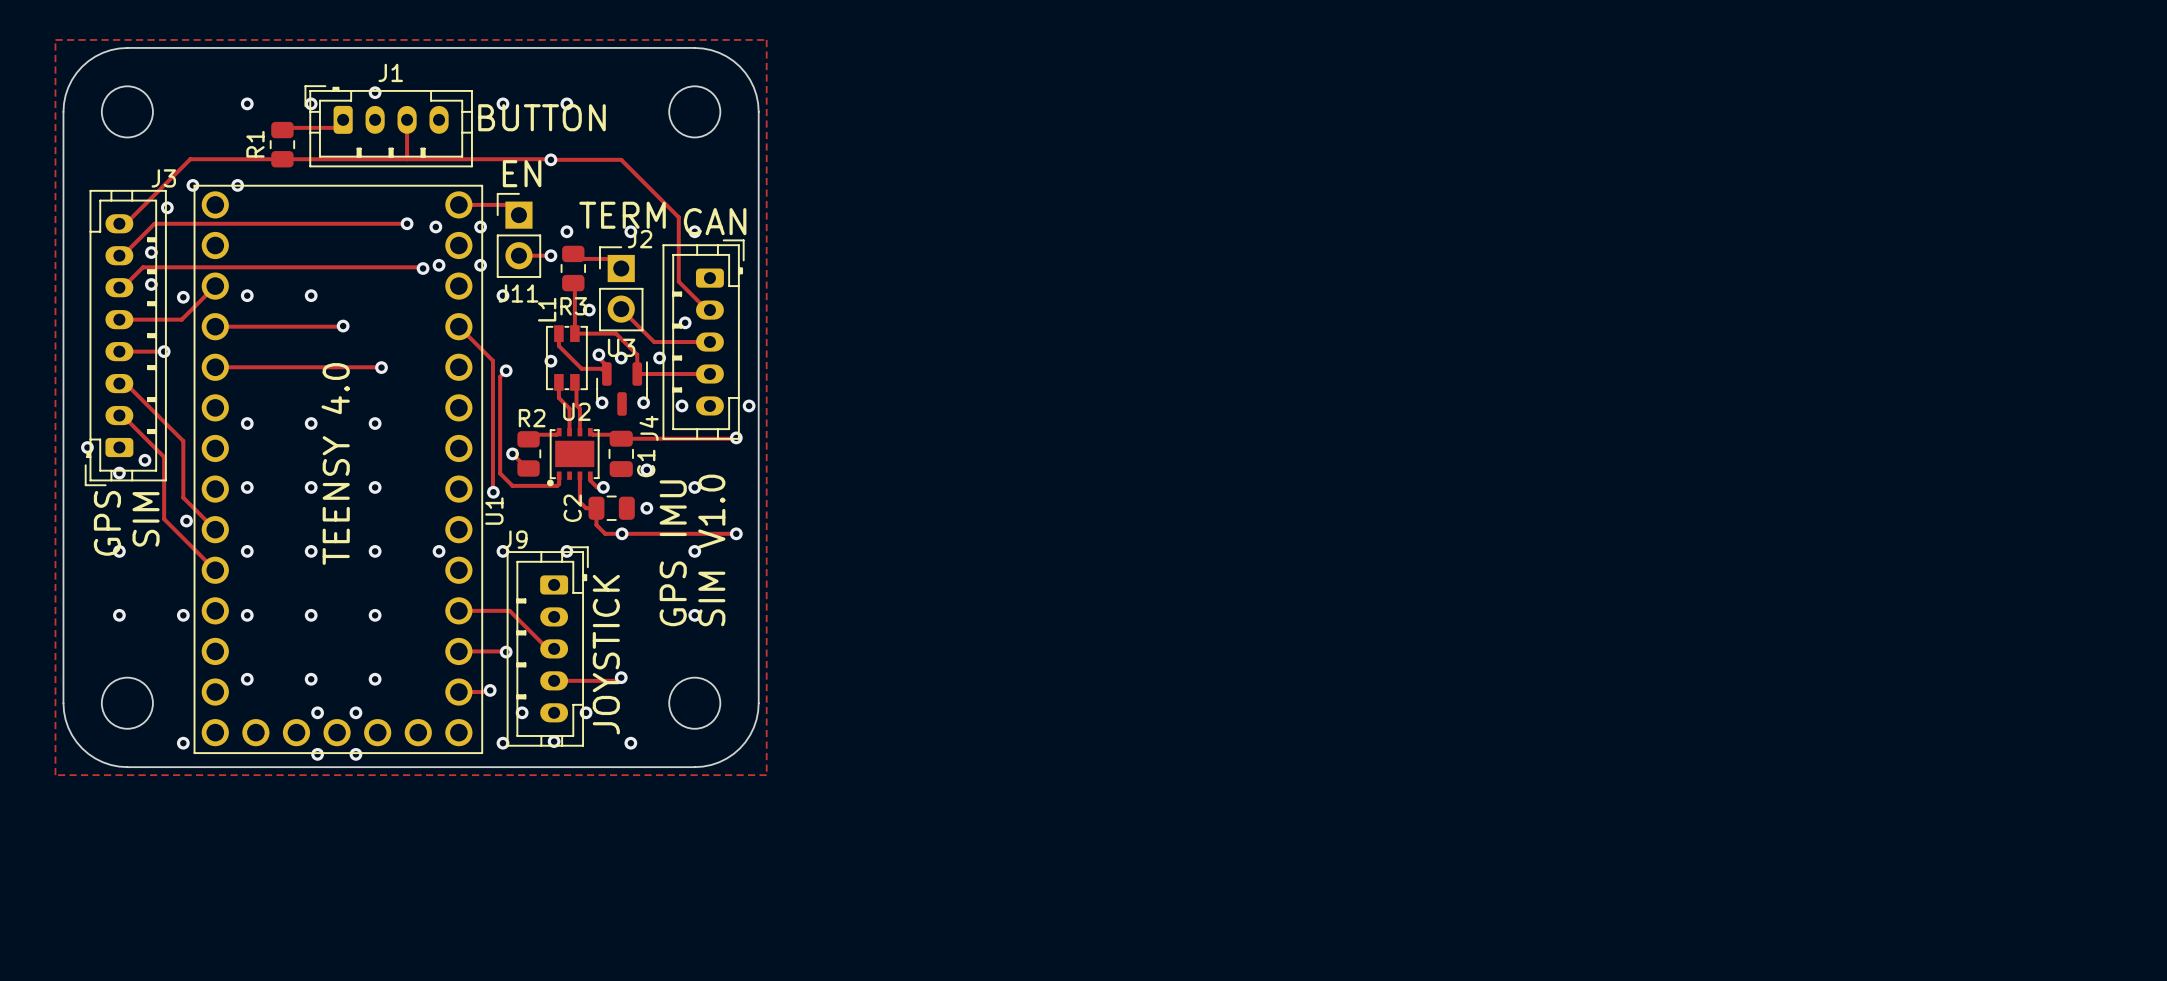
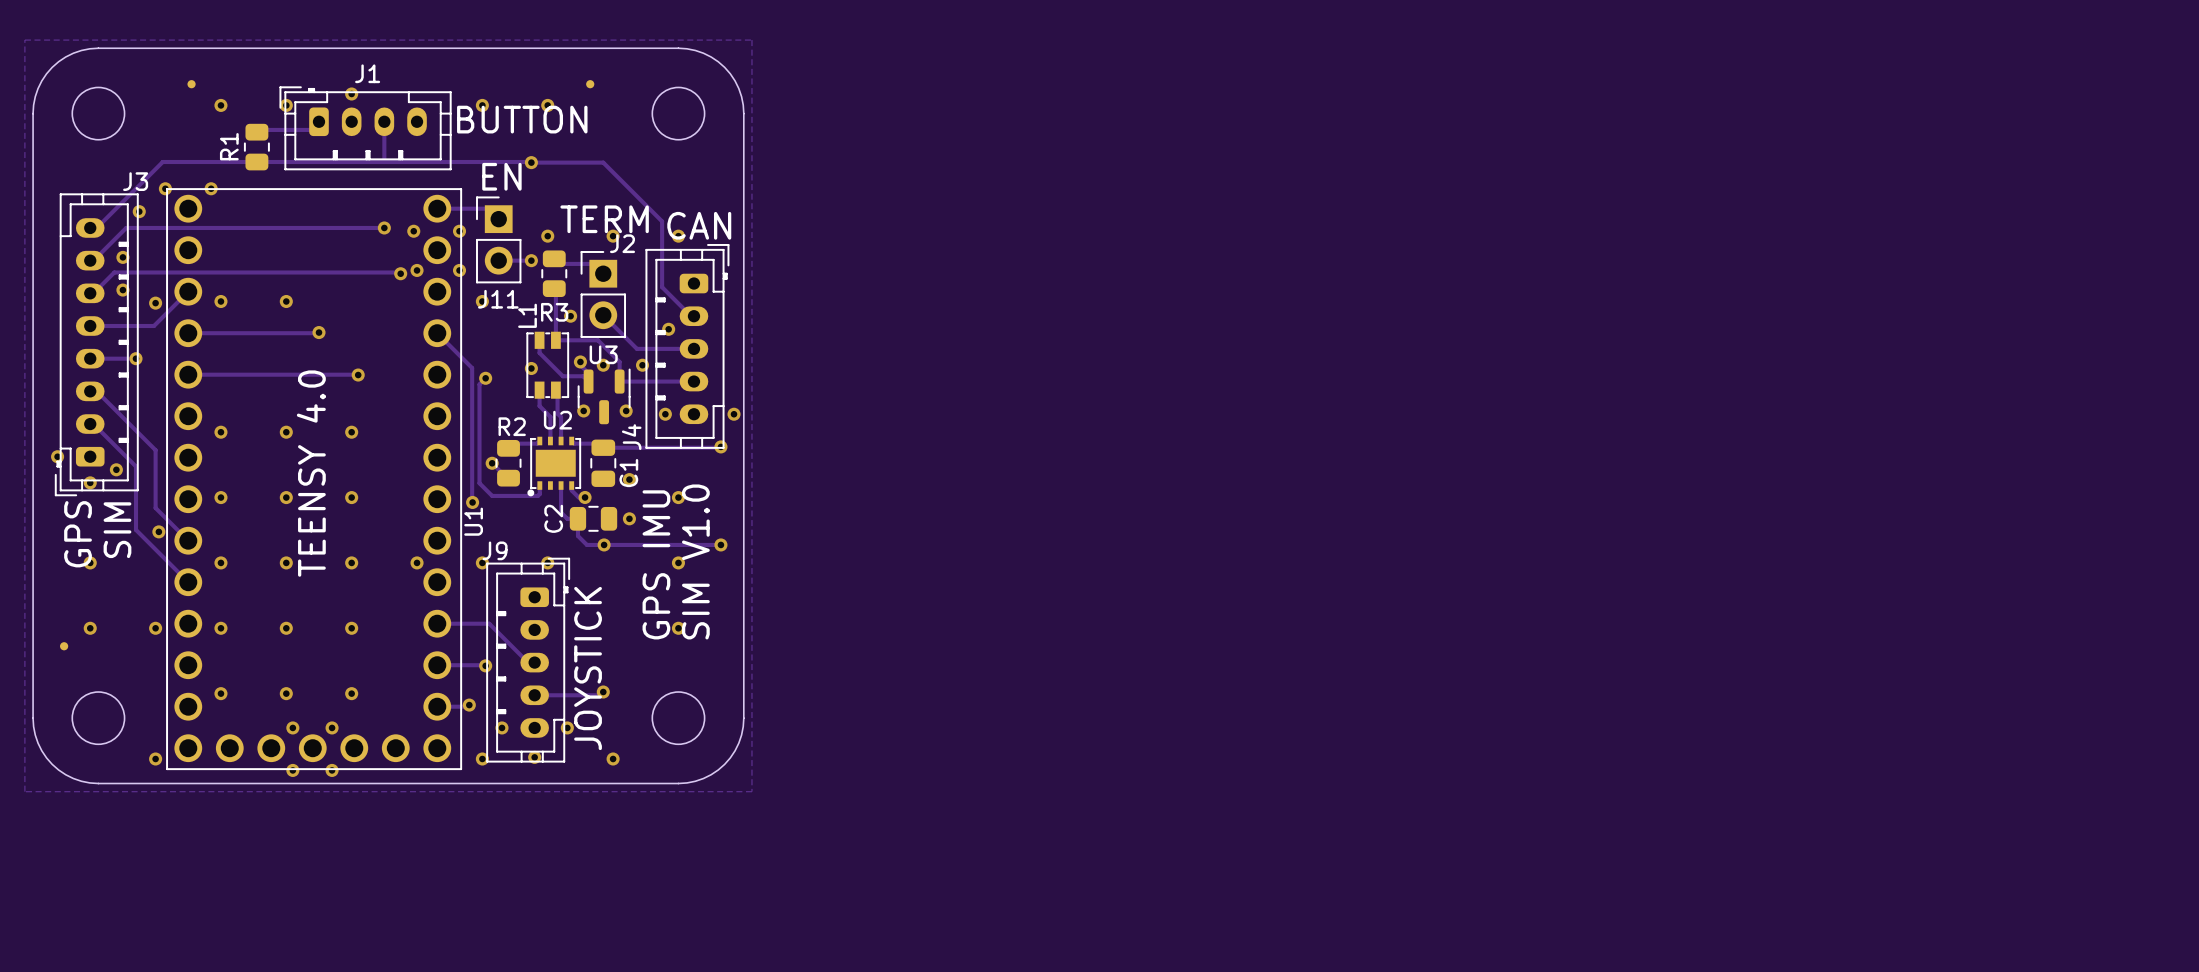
part: none -> (191, 84)
part: none -> (590, 84)
part: none -> (64, 646)

